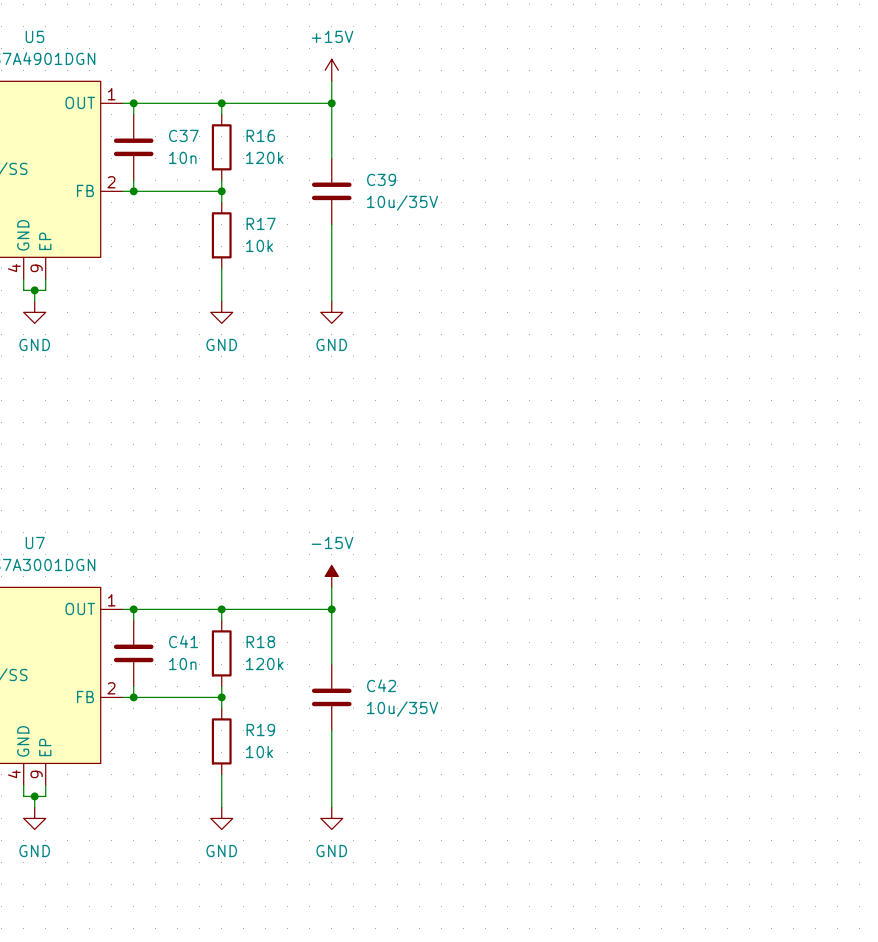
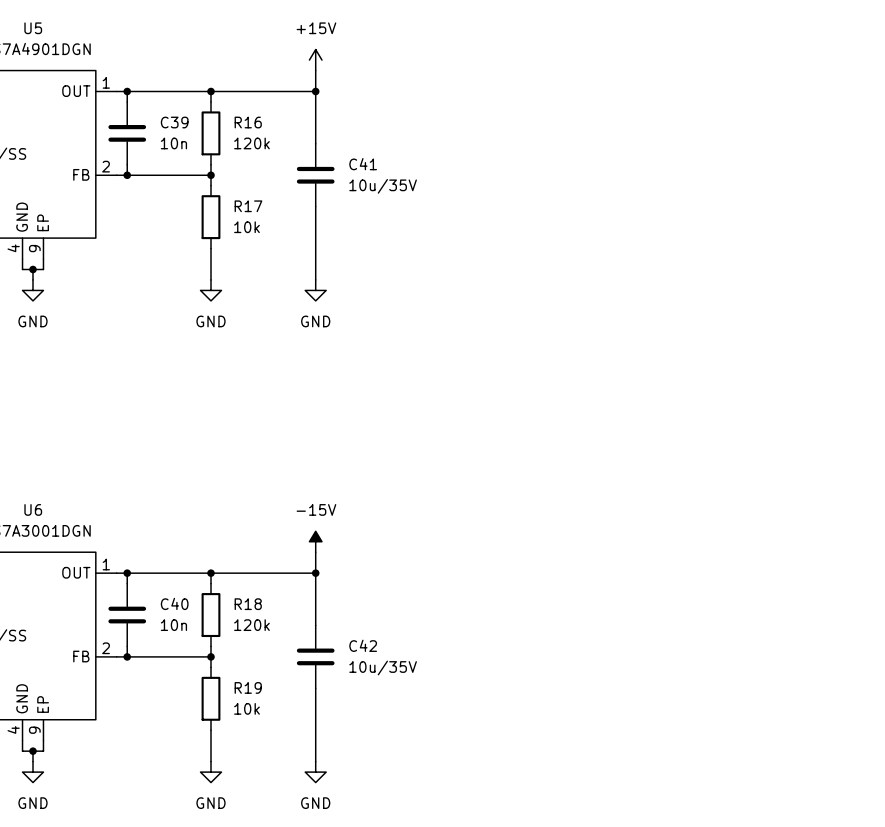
C37 name: C37 (183, 135) -> C39 (174, 122)
C39 name: C39 (381, 179) -> C41 (363, 164)
U7 name: U7 (35, 542) -> U6 (33, 509)
C41 name: C41 (183, 641) -> C40 (174, 603)

